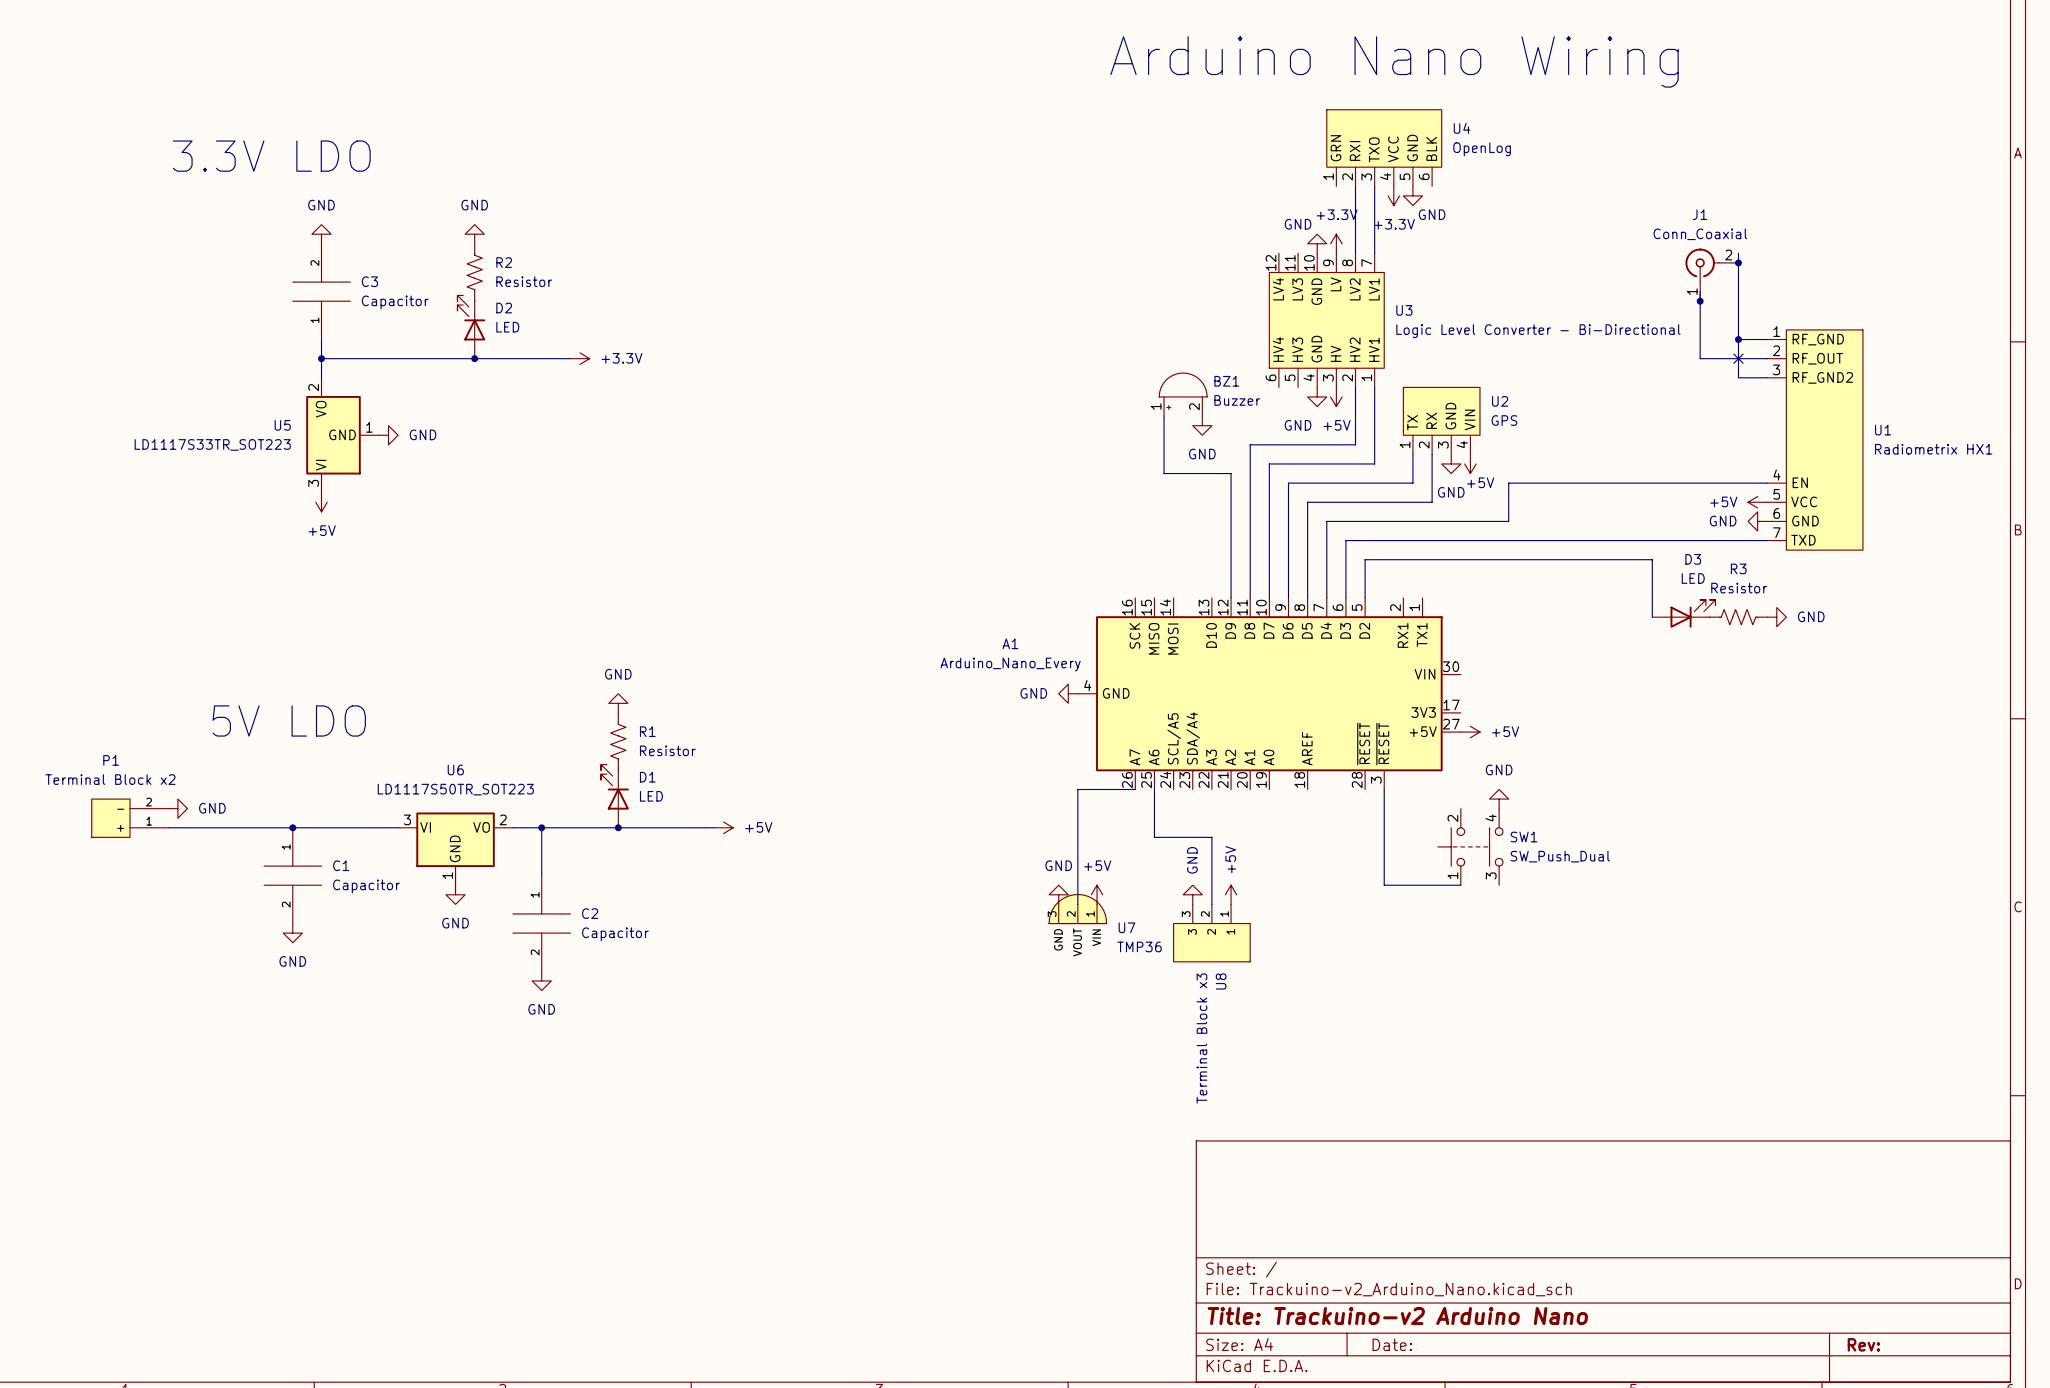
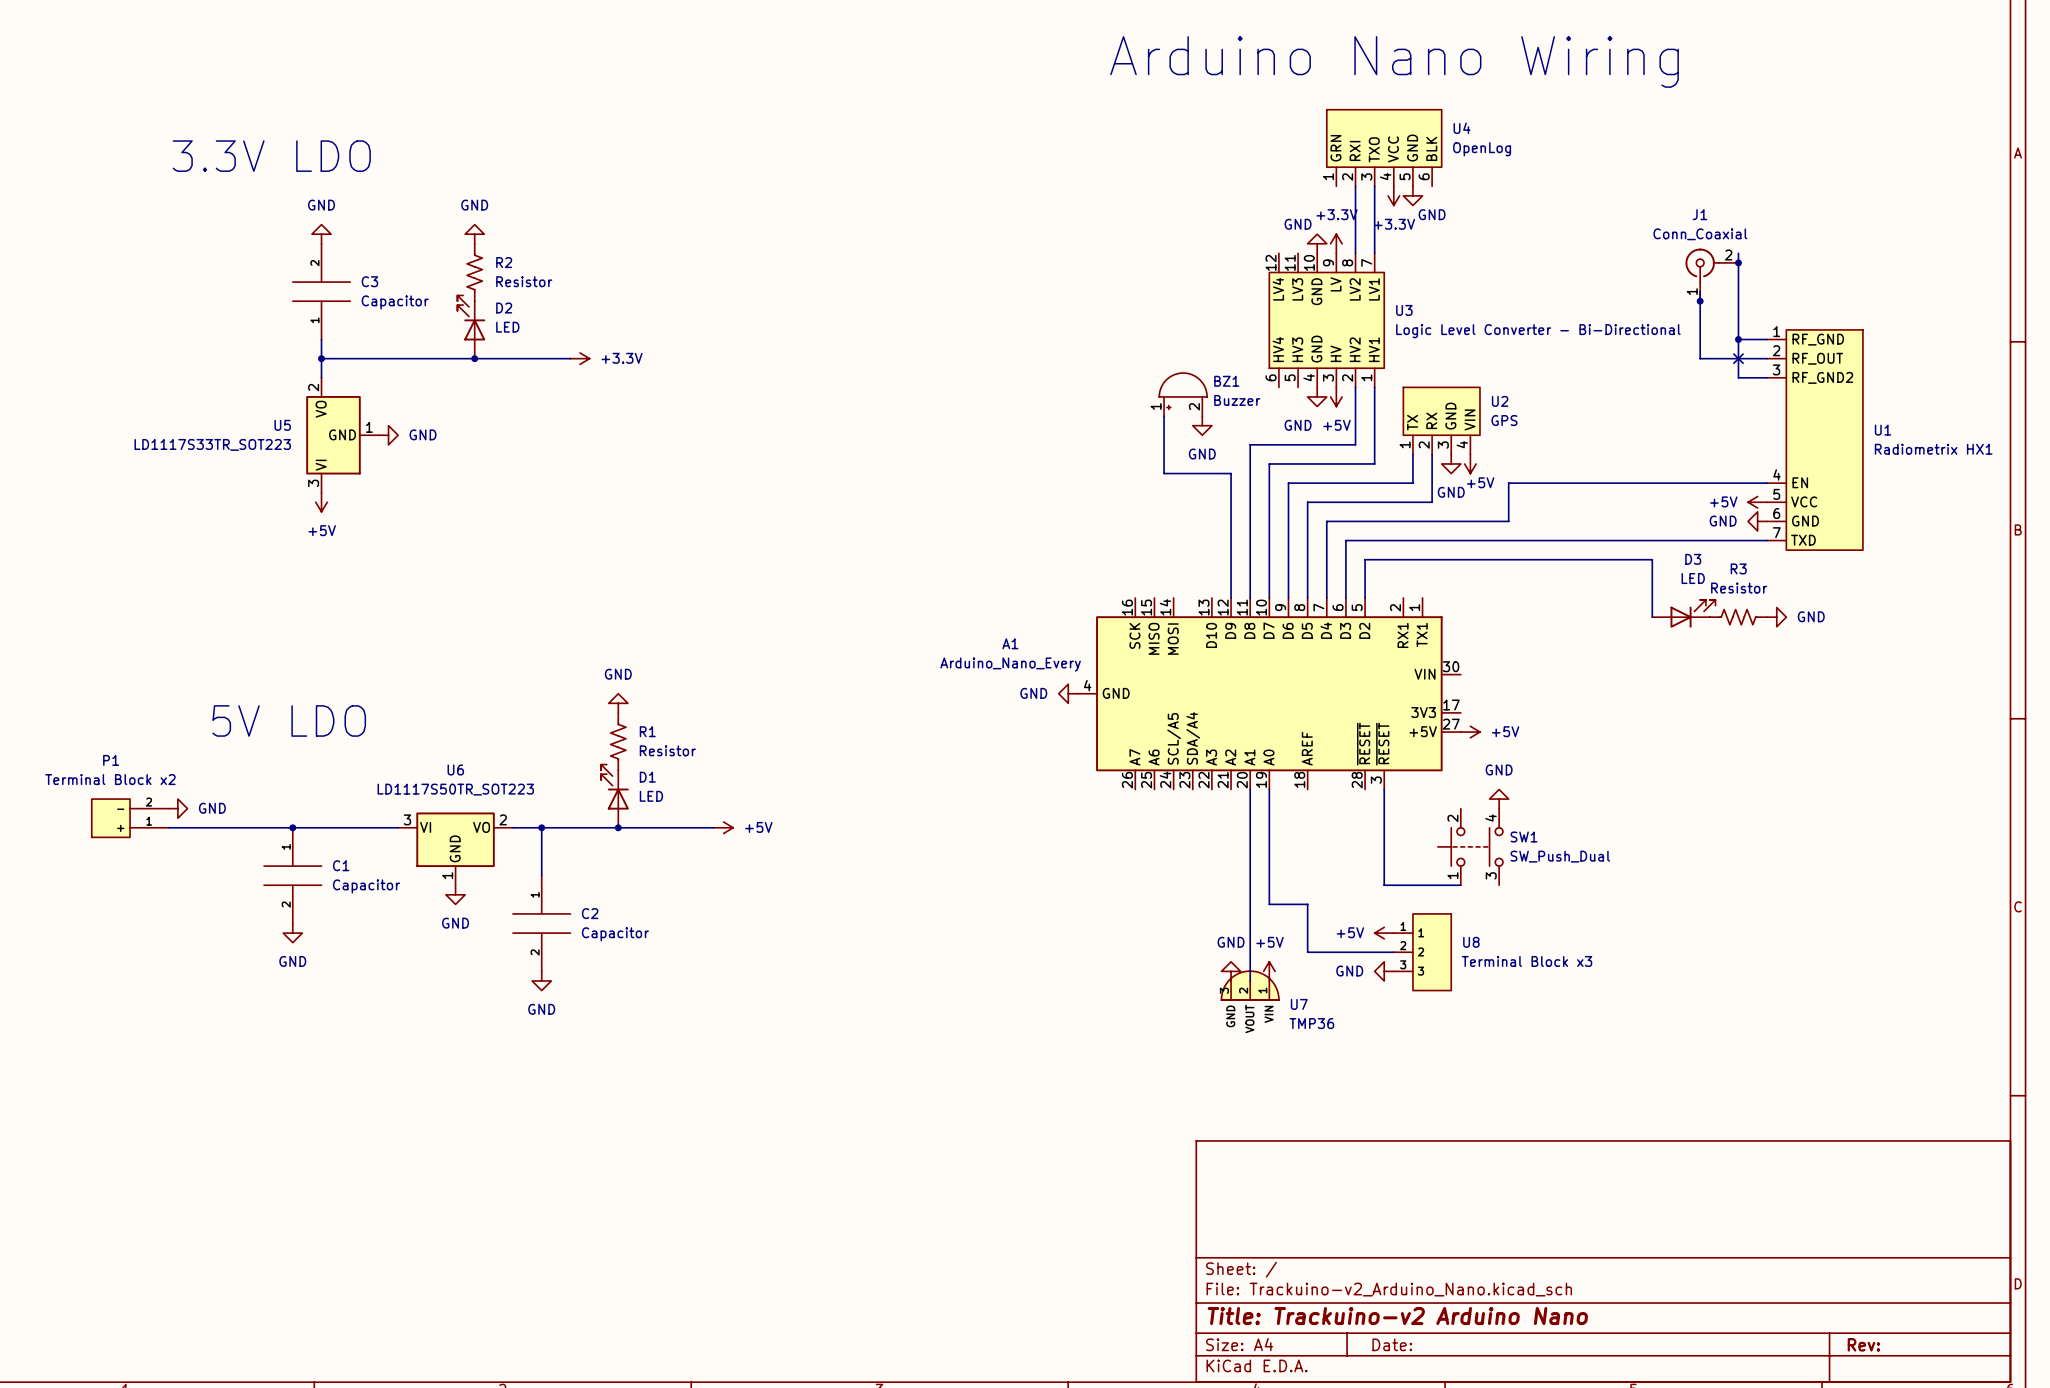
wire: (1135, 789) (1077, 789) (1077, 904) -> none
wire: (1154, 789) (1154, 837) (1211, 837) (1211, 904) -> none
wire: none -> (1250, 789) (1250, 980)
wire: none -> (1269, 789) (1269, 904) (1307, 904) (1307, 952) (1393, 952)
power symbol text rotation: 0° (1192, 860) -> 90° clockwise (1231, 942)
power symbol: GND (1058, 894) -> none
power symbol: +5V (1097, 894) -> none
power symbol position: GND (1192, 894) -> GND (1231, 971)
power symbol: +5V (1231, 894) -> none
U7 position: (1077, 909) -> (1250, 985)
U8 position: (1211, 933) -> (1422, 952)
power symbol: none -> +5V (1384, 933)
U8 rotation: 0° (1211, 942) -> 90° counterclockwise (1432, 952)
power symbol: none -> +5V (1269, 971)
power symbol: none -> GND (1384, 971)

